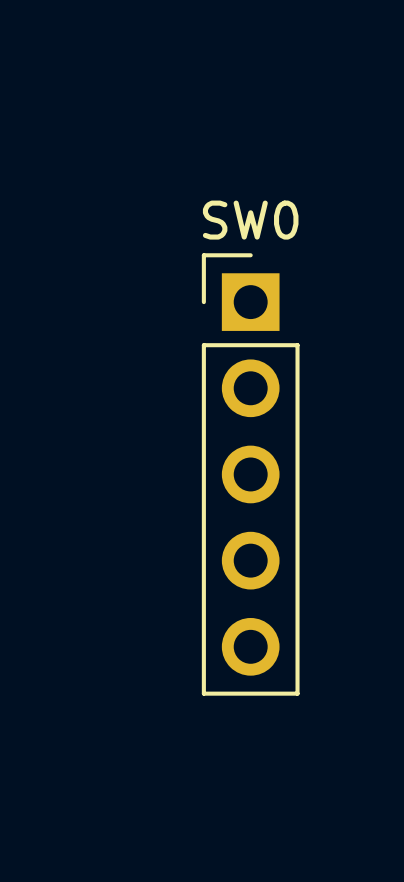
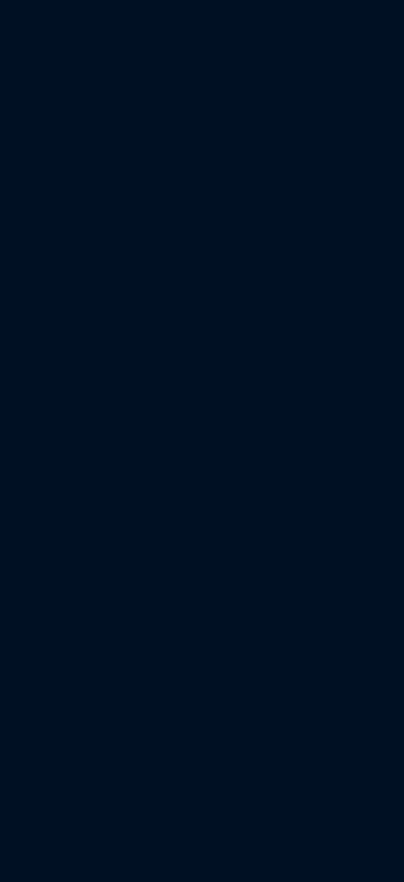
SW0: (250, 474) -> none

